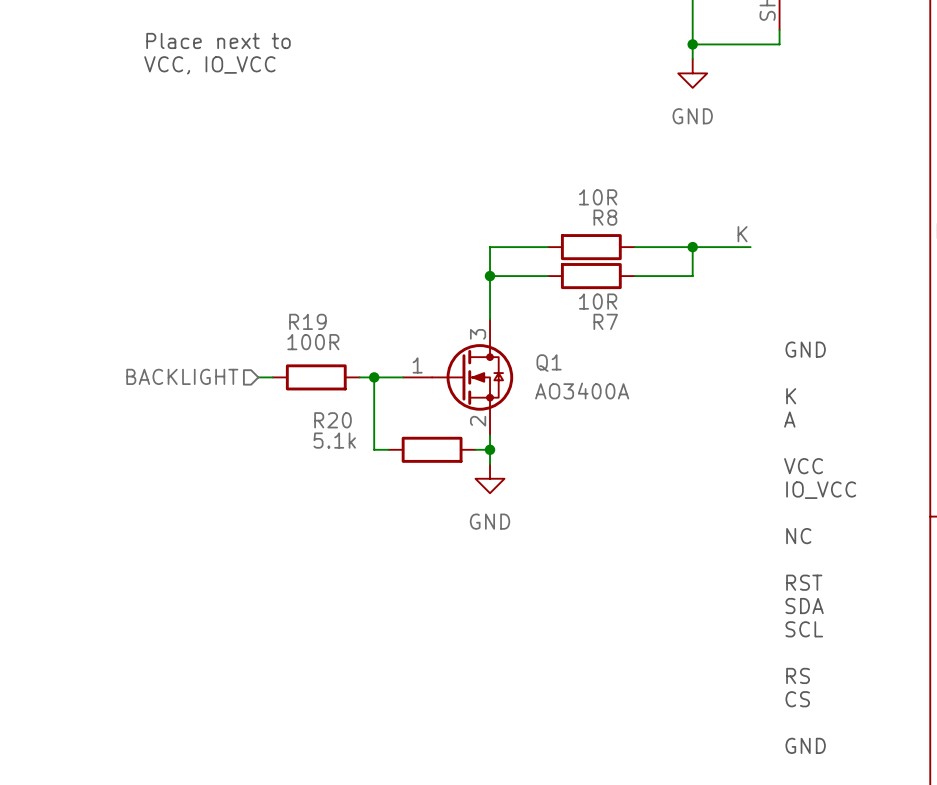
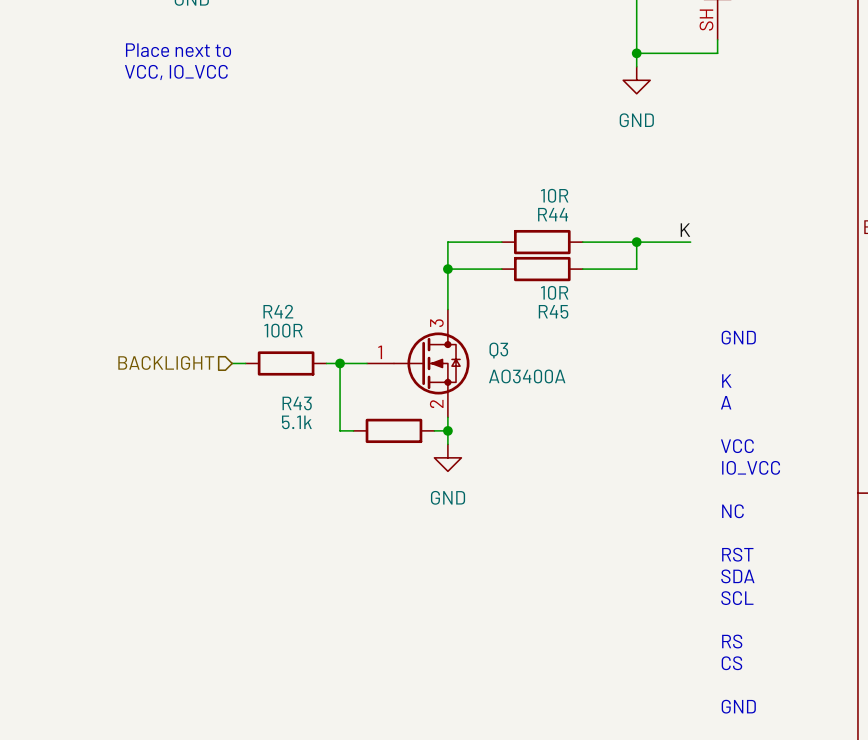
R8 name: R8 (605, 217) -> R44 (553, 214)
R19 name: R19 (307, 321) -> R42 (278, 311)
R7 name: R7 (605, 321) -> R45 (553, 311)
Q1 name: Q1 (549, 363) -> Q3 (498, 350)
R20 name: R20 (333, 420) -> R43 (297, 403)

